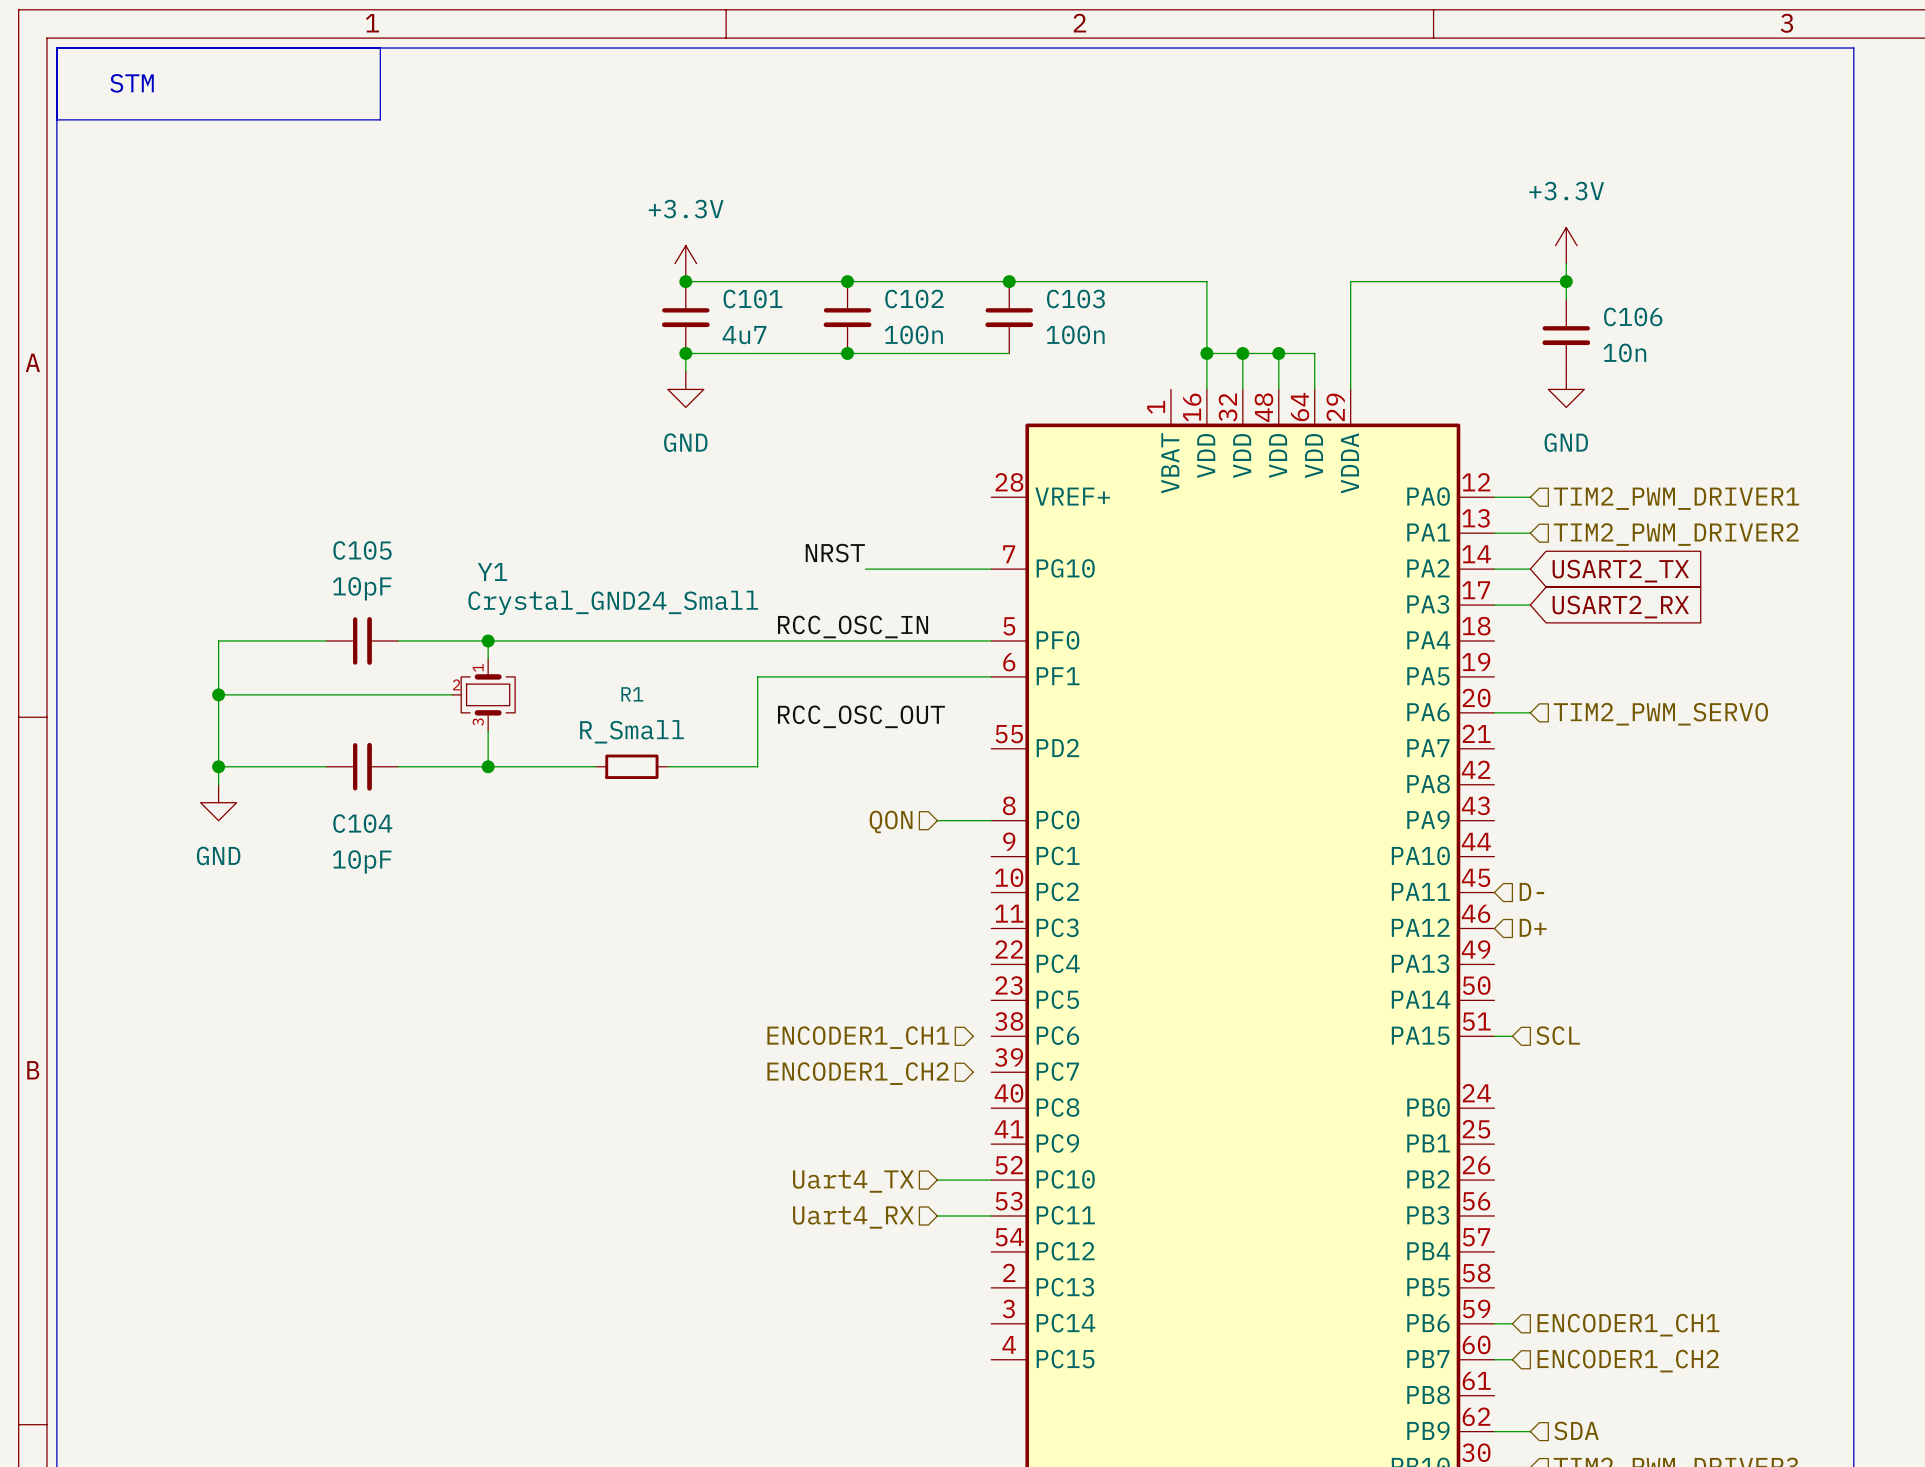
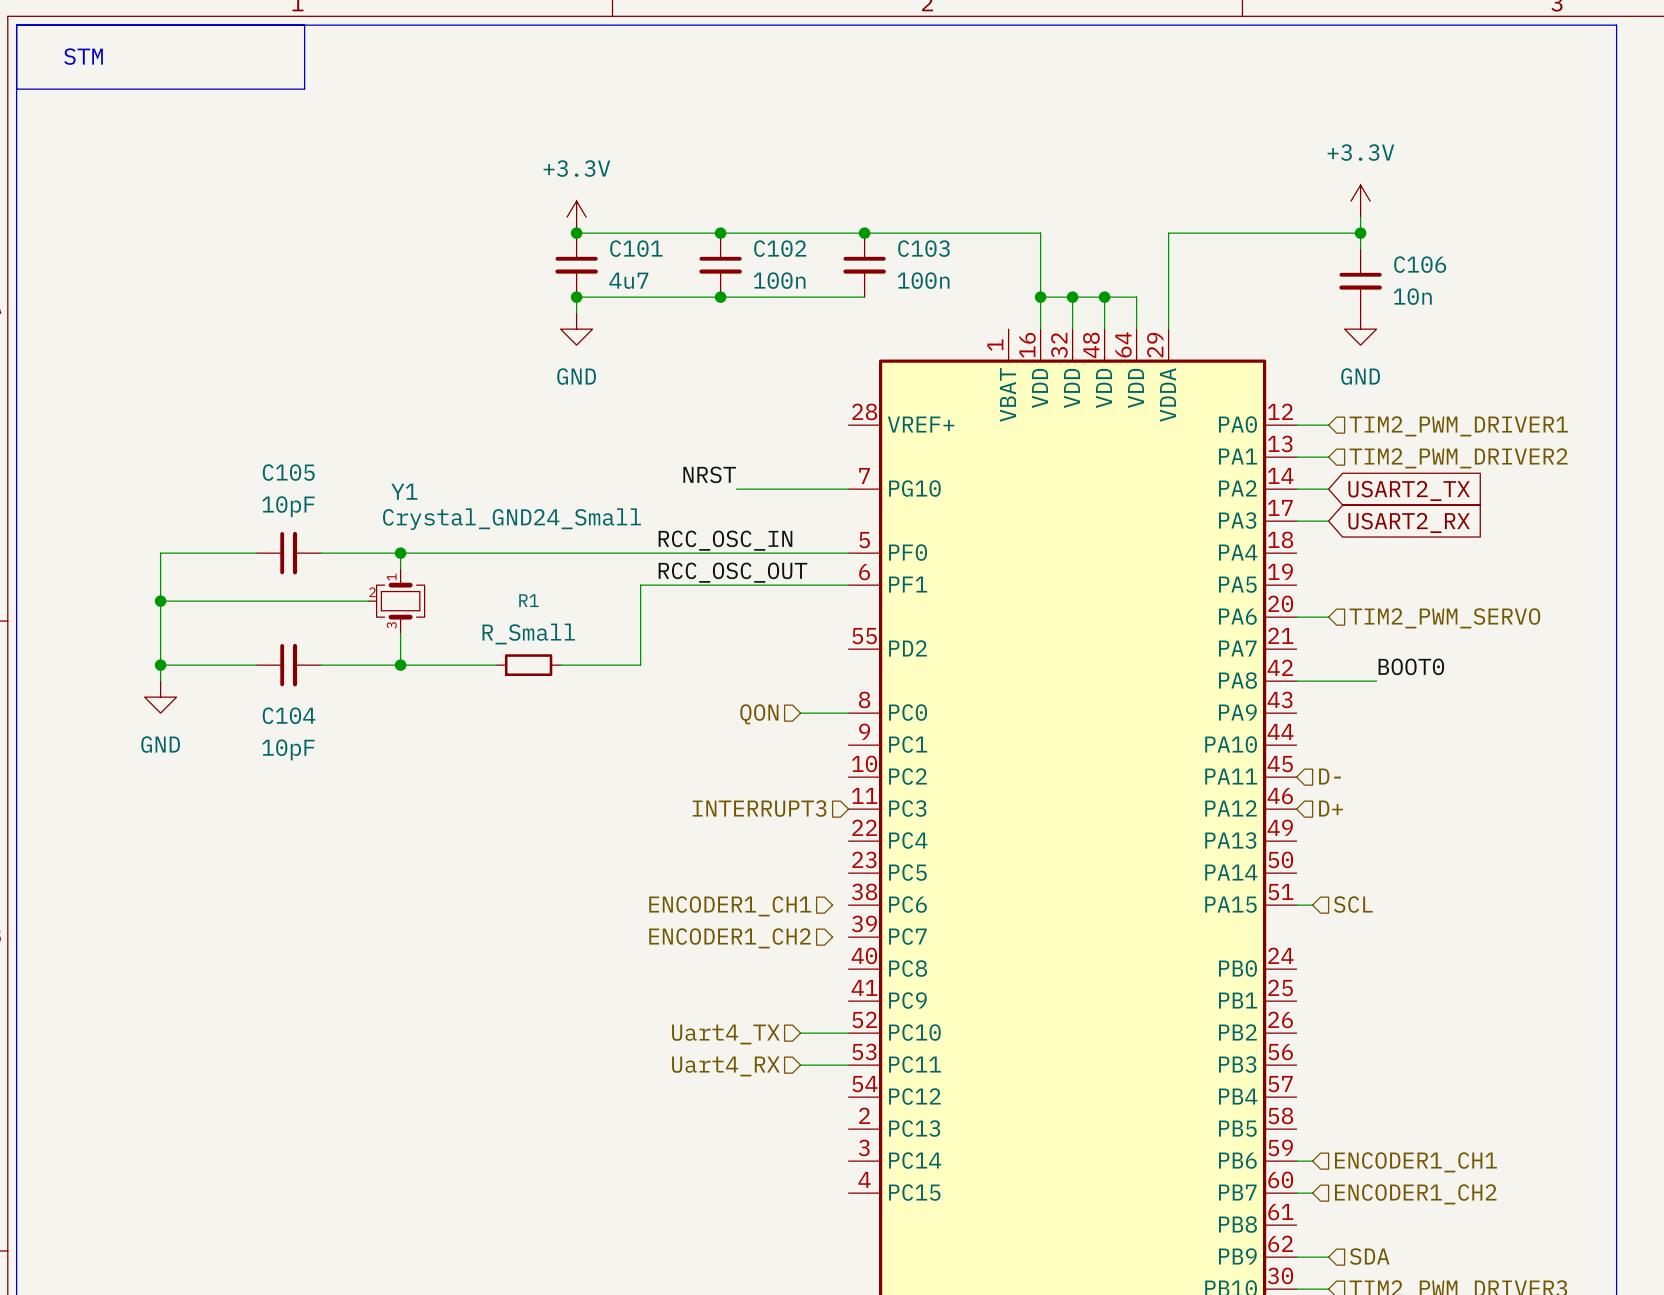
label position: RCC_OSC_OUT (861, 716) -> RCC_OSC_OUT (733, 572)
label: none -> BOOT0 (1411, 666)
wire: none -> (1296, 681) (1376, 681)
hierarchical label: none -> INTERRUPT3 (759, 808)

